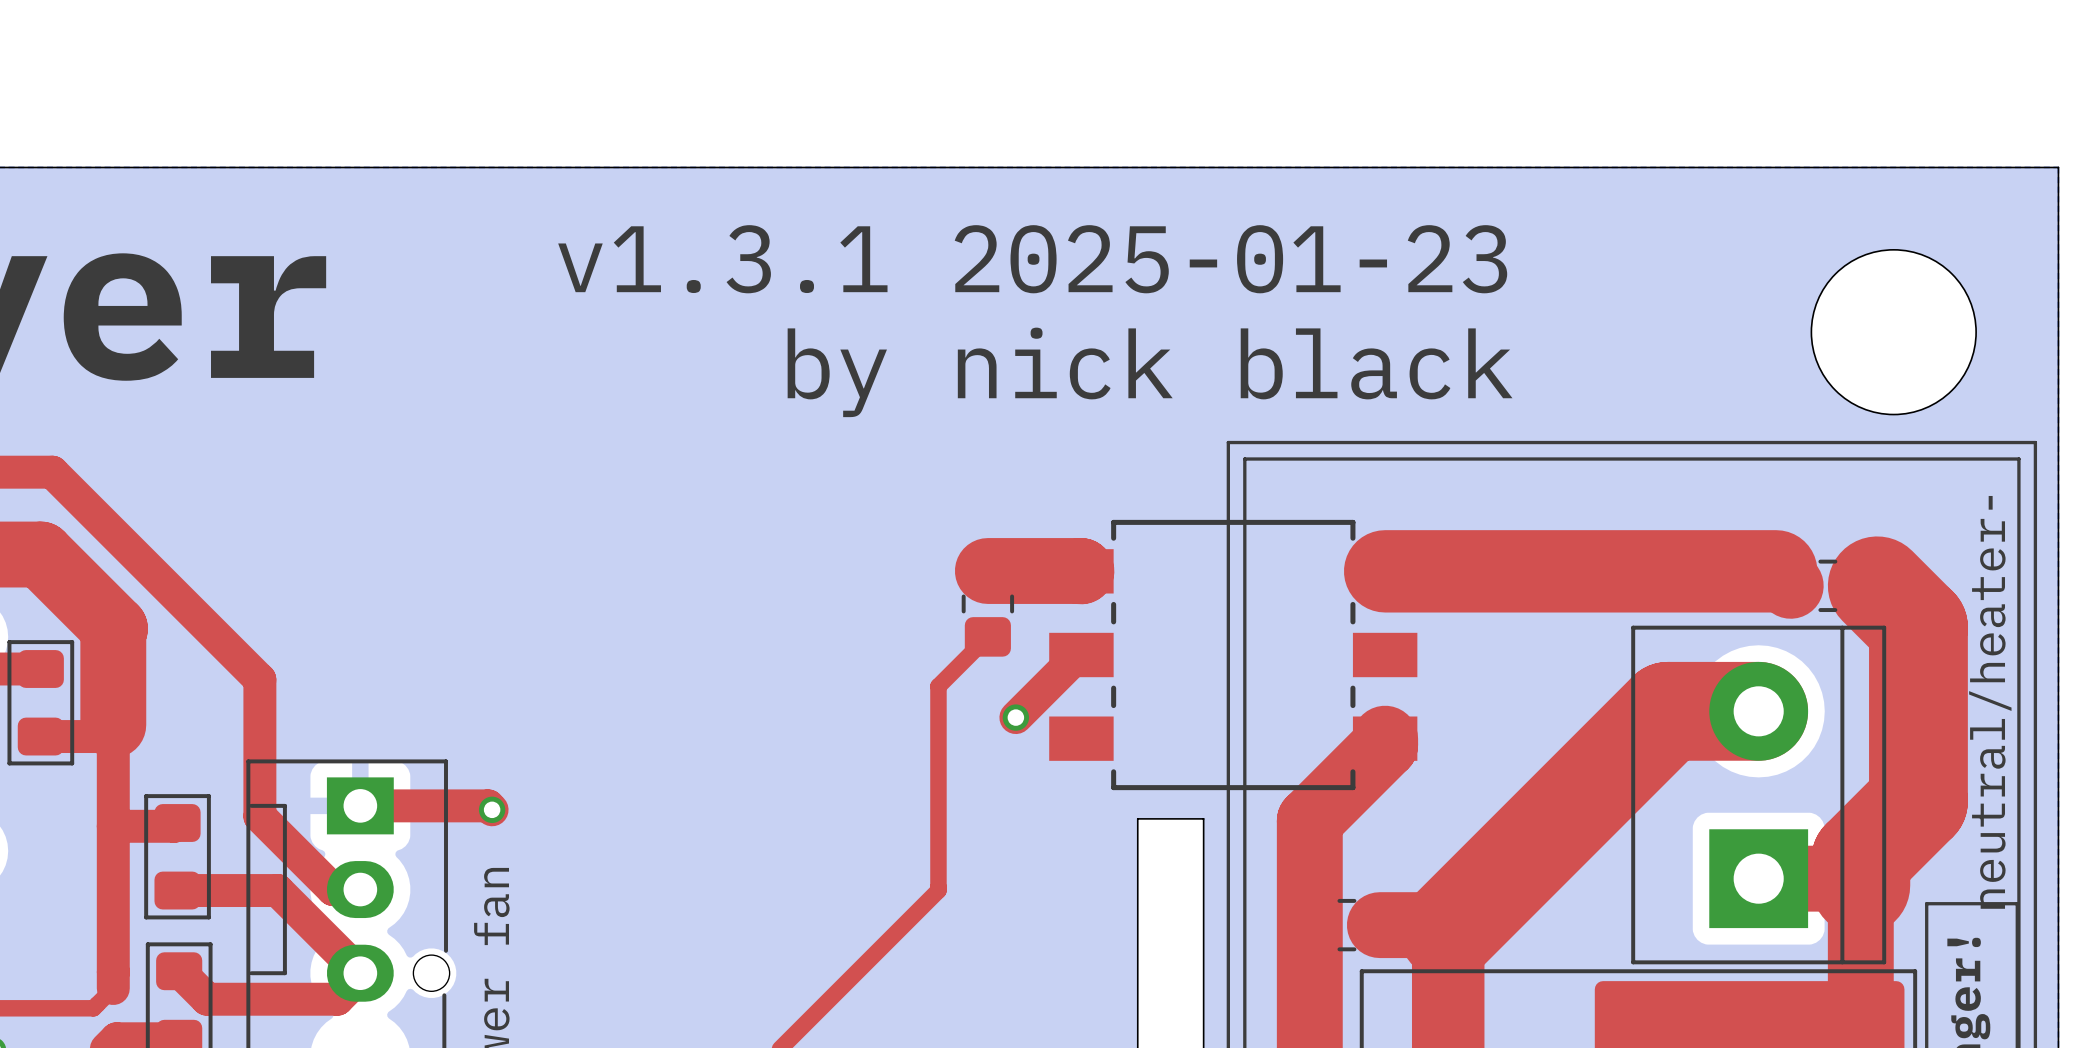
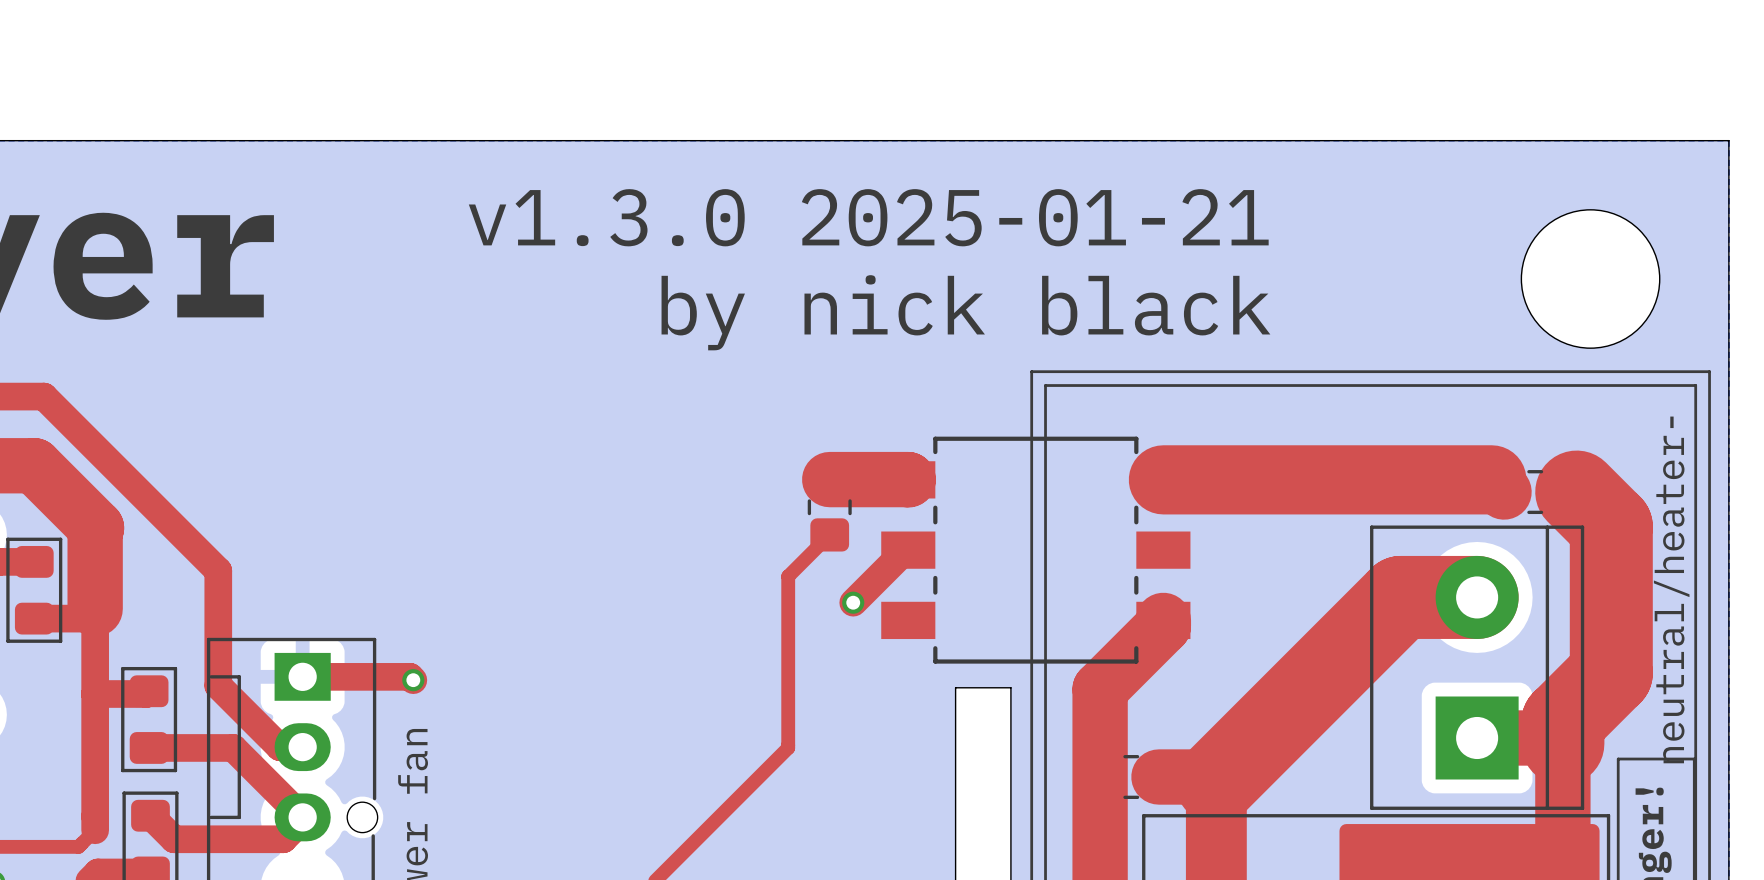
text: v1.3.1 2025-01-23 (1032, 259) -> v1.3.0 2025-01-21 (868, 217)

